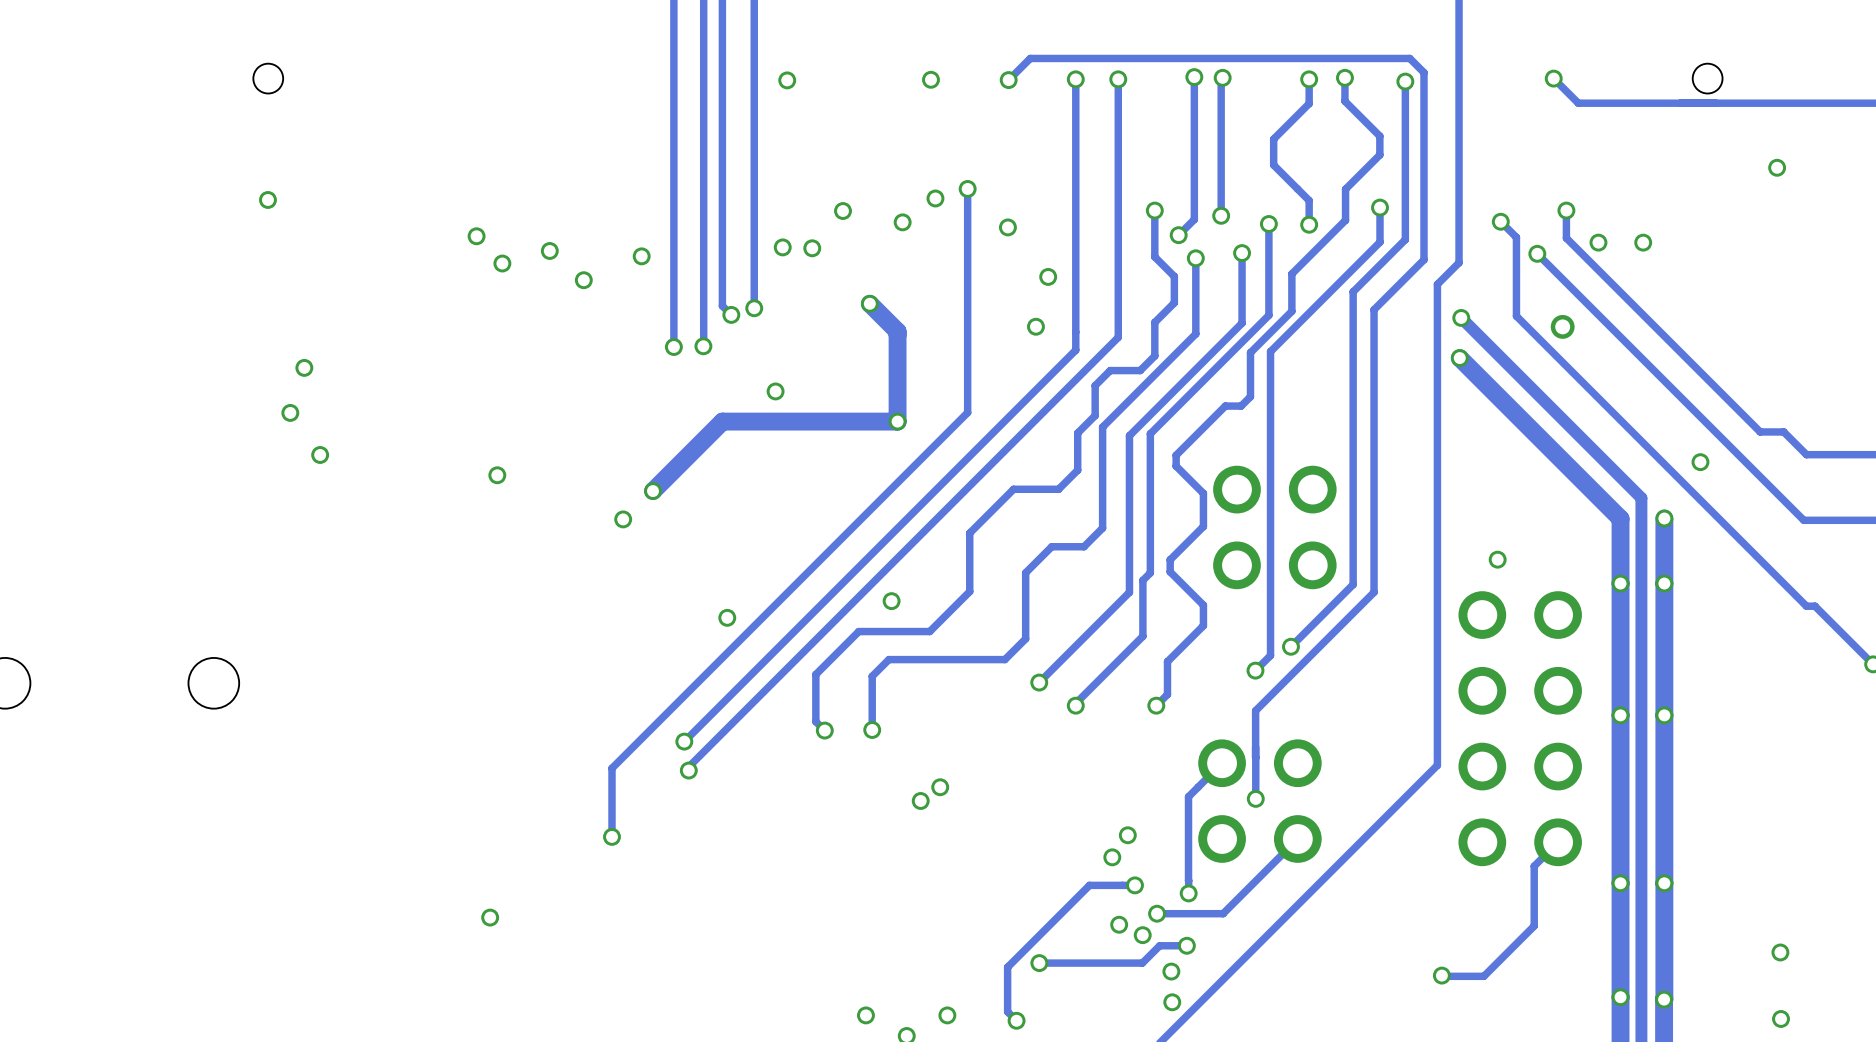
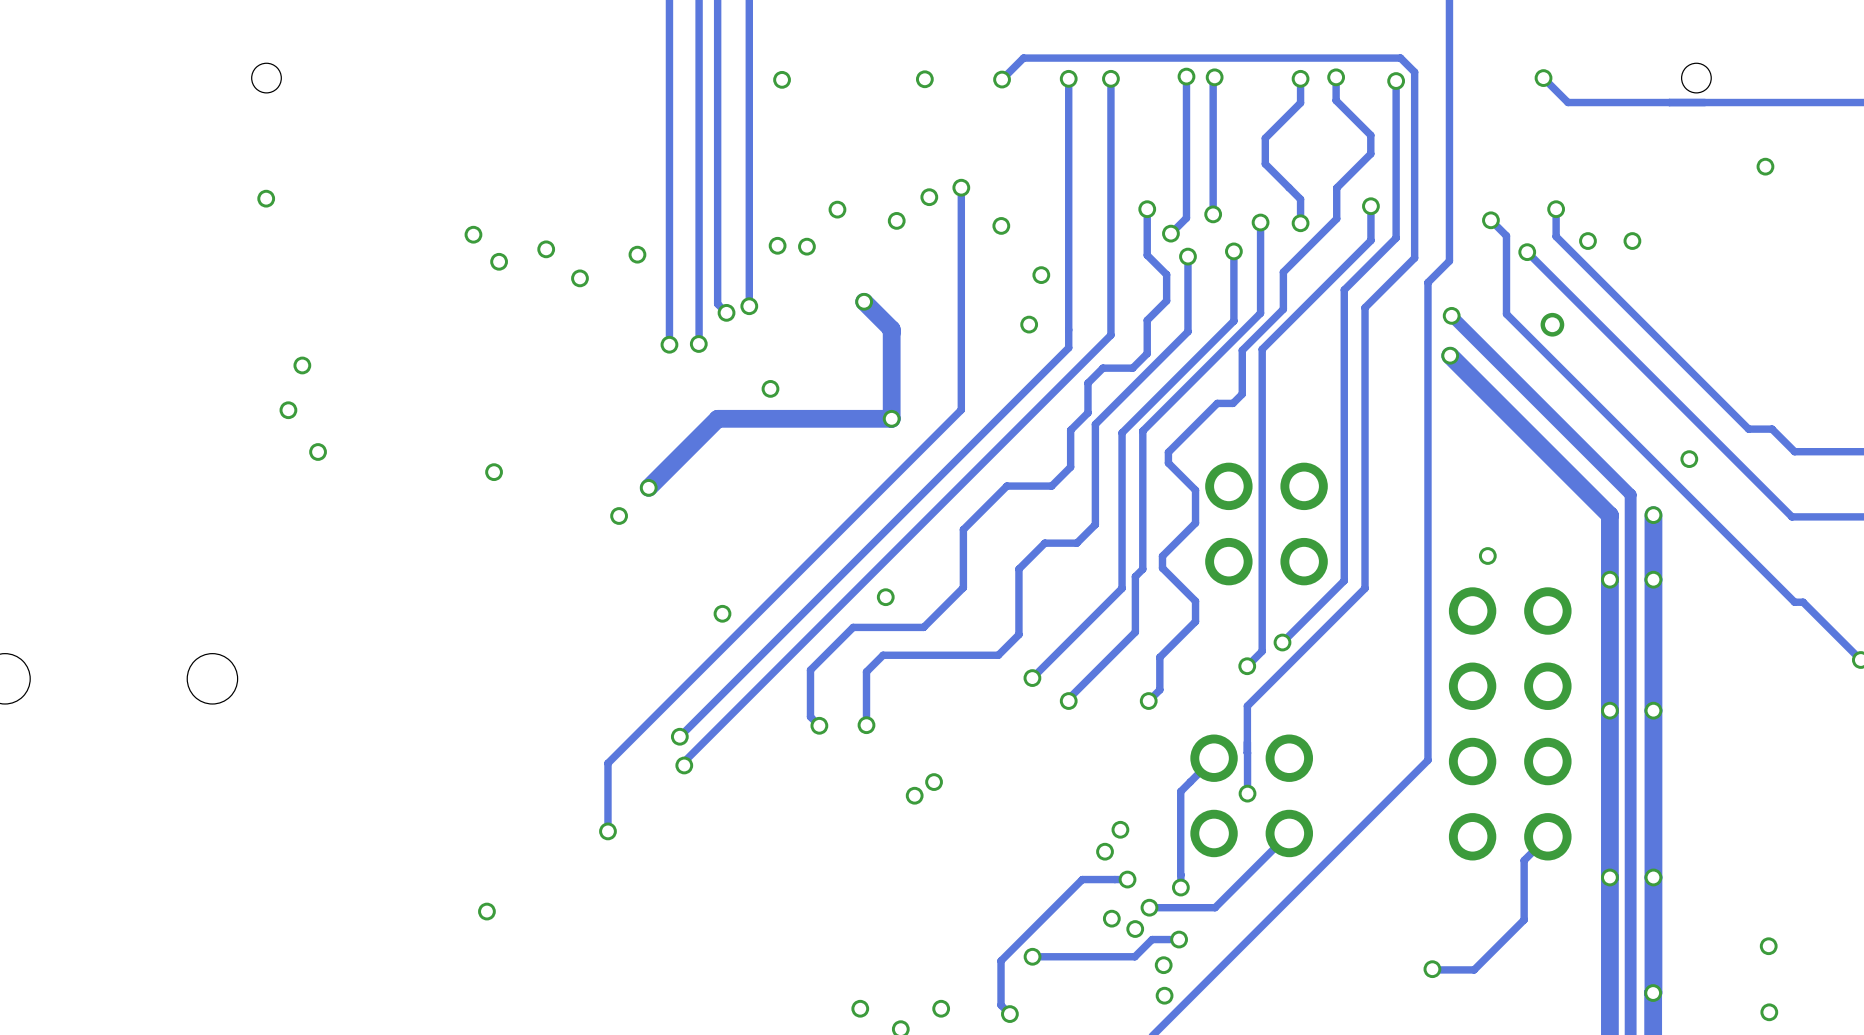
via: (1620, 997) -> none

